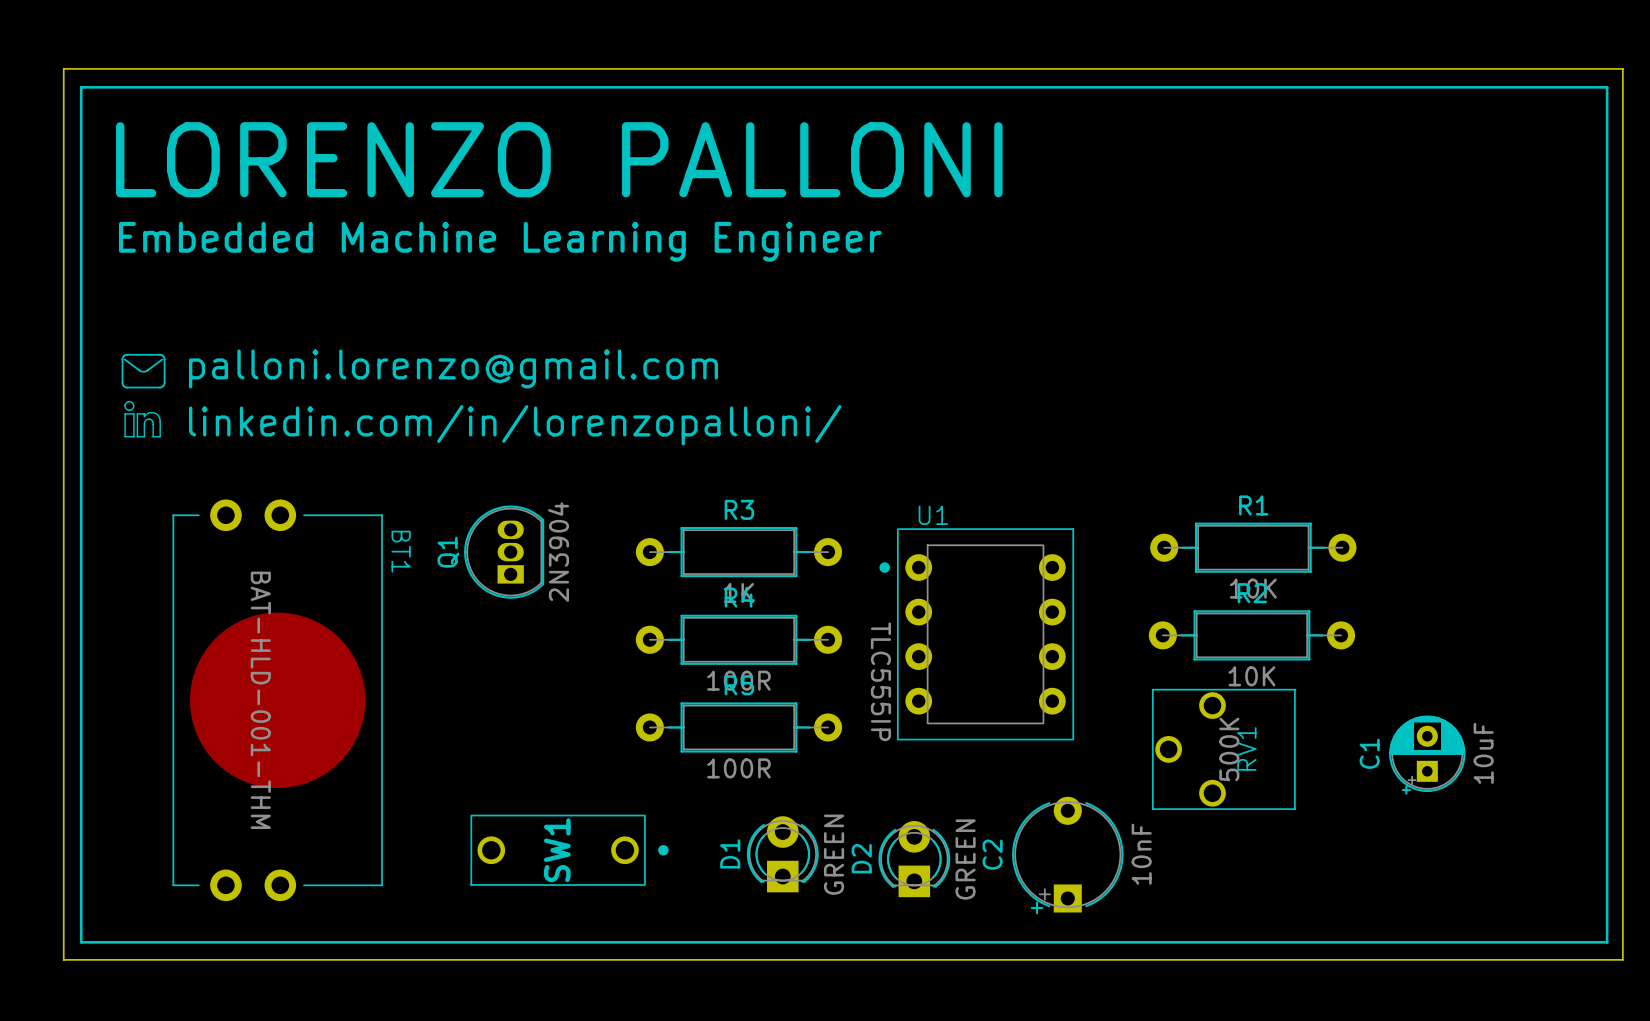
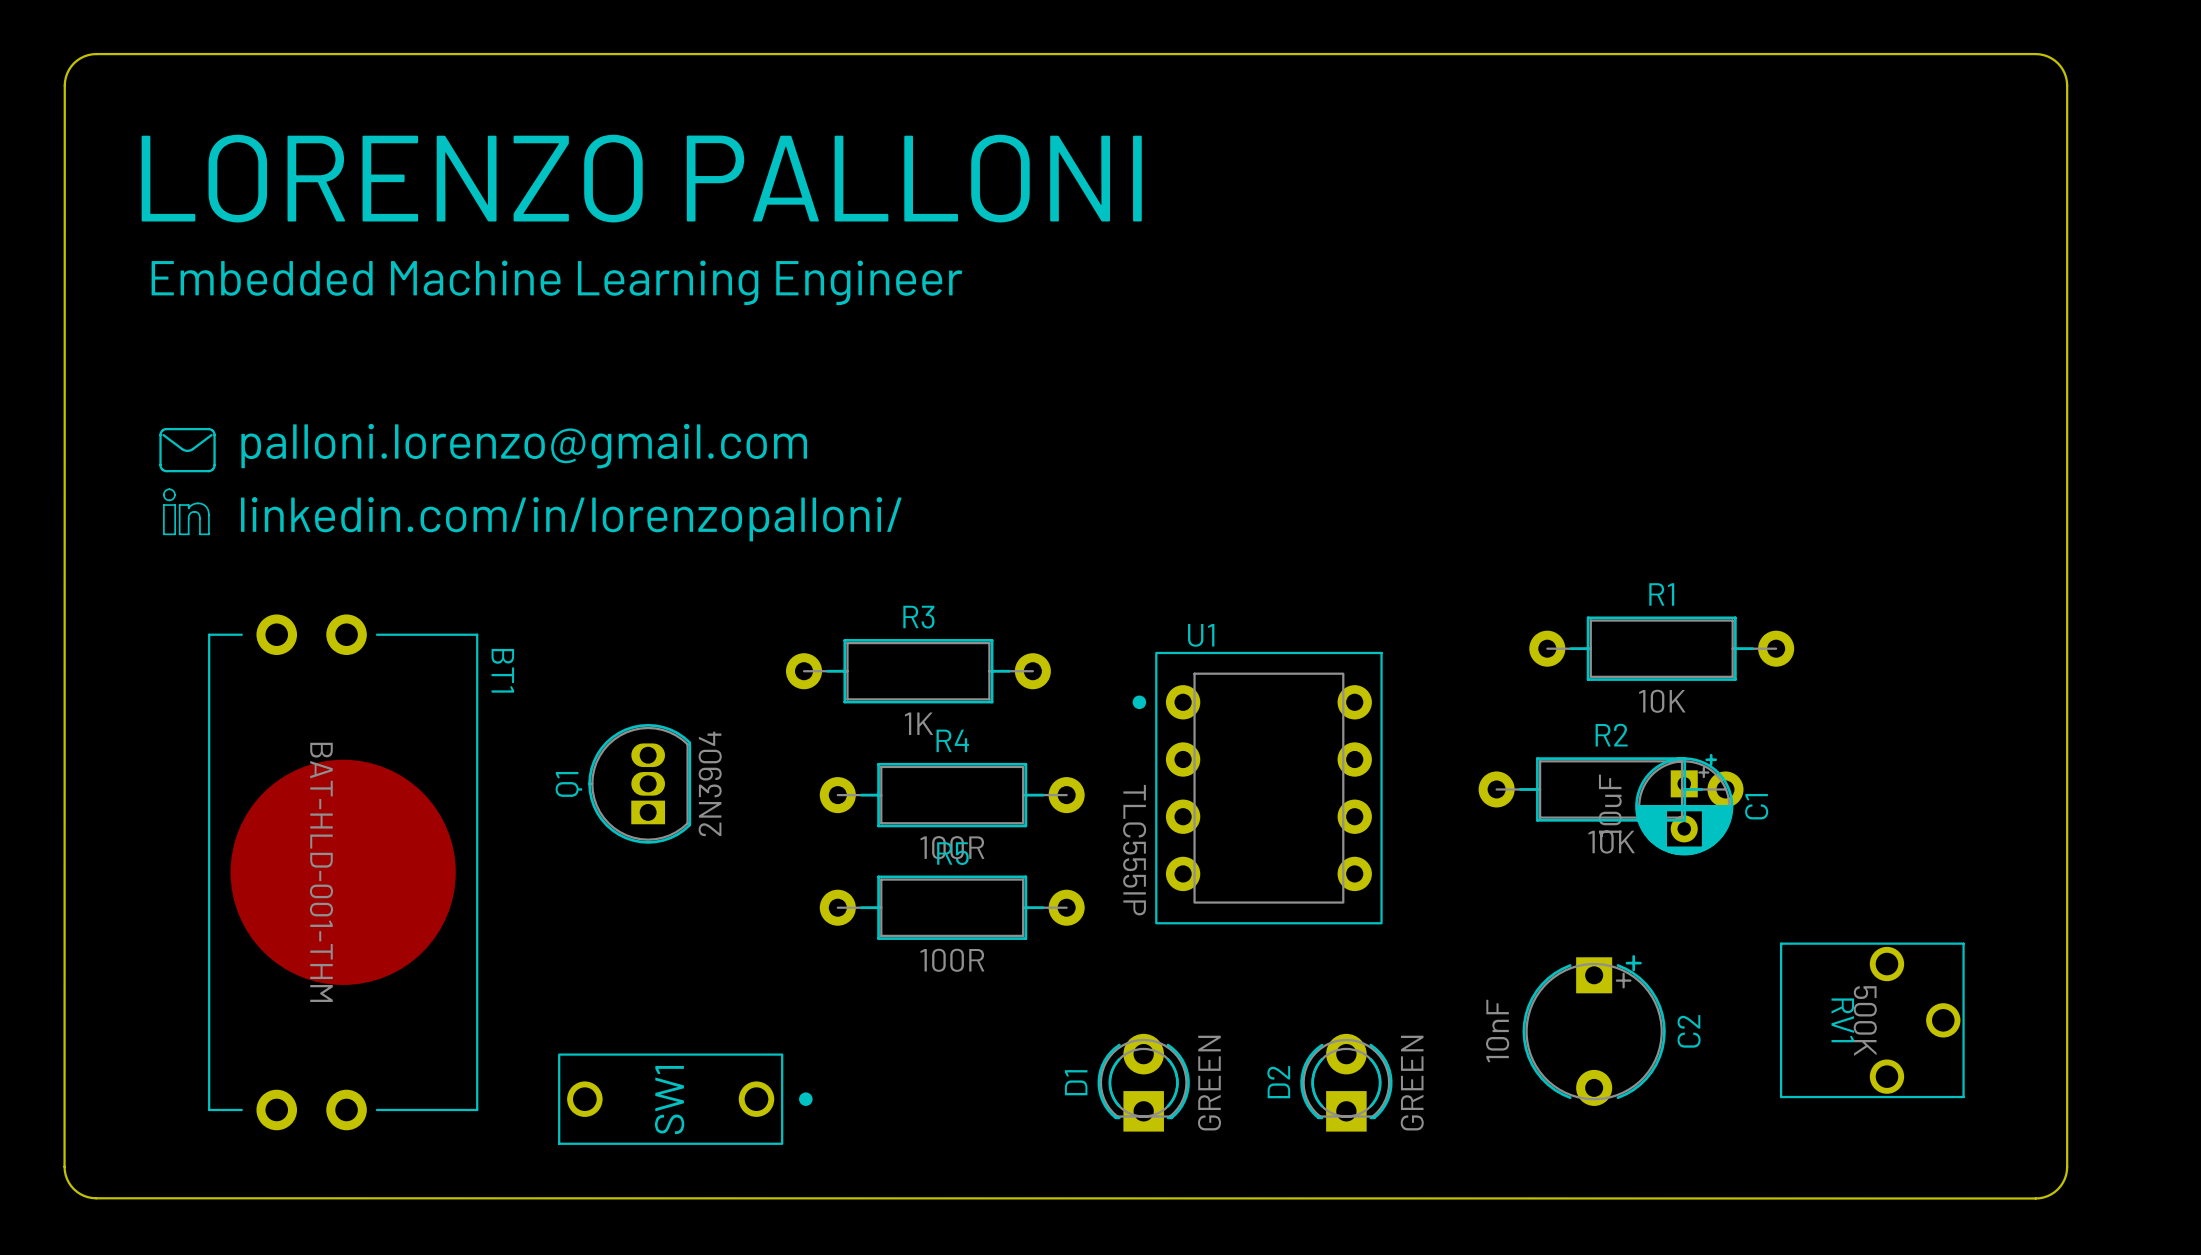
board edge: (63, 68) (1622, 68) (1622, 959) (63, 959) (63, 68) -> (96, 54) (84, 56) (74, 63) (67, 73) (64, 85) (64, 1166) (68, 1182) (80, 1194) (96, 1198) (2035, 1198) (2051, 1194) (2062, 1182) (2067, 1166) (2067, 85) (2062, 69) (2051, 58) (2035, 54) (96, 54)
line: (81, 87) (1607, 87) (1607, 942) (81, 942) (81, 87) -> none
R1 position: (1253, 547) -> (1661, 648)
BT1 name position: BT1 (401, 551) -> BT1 (502, 670)
Q1 position: (504, 552) -> (639, 783)
R3 position: (738, 552) -> (918, 671)
BT1 position: (277, 700) -> (343, 872)
RV1 rotation: 0° (1223, 749) -> 180° (1872, 1020)
RV1 position: (1223, 749) -> (1872, 1020)
C1 rotation: 0° (1427, 755) -> 180° (1684, 804)
C1 position: (1427, 755) -> (1684, 804)
SW1 position: (569, 850) -> (685, 1099)
D1 position: (782, 854) -> (1143, 1082)
C2 rotation: 0° (1067, 855) -> 180° (1594, 1030)
C2 position: (1067, 855) -> (1594, 1030)
D2 position: (914, 859) -> (1346, 1082)

